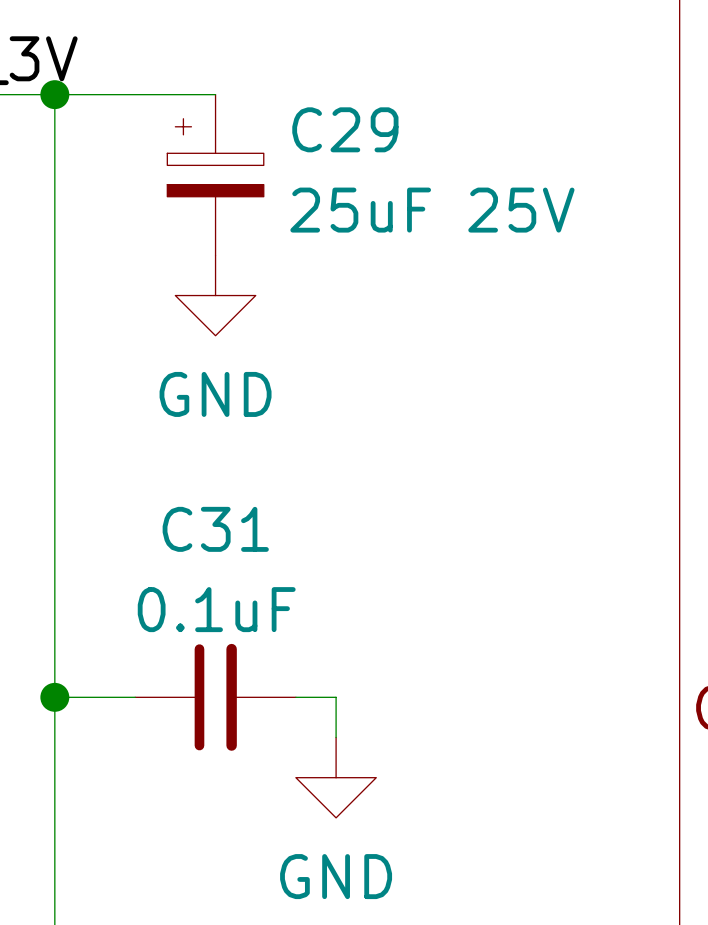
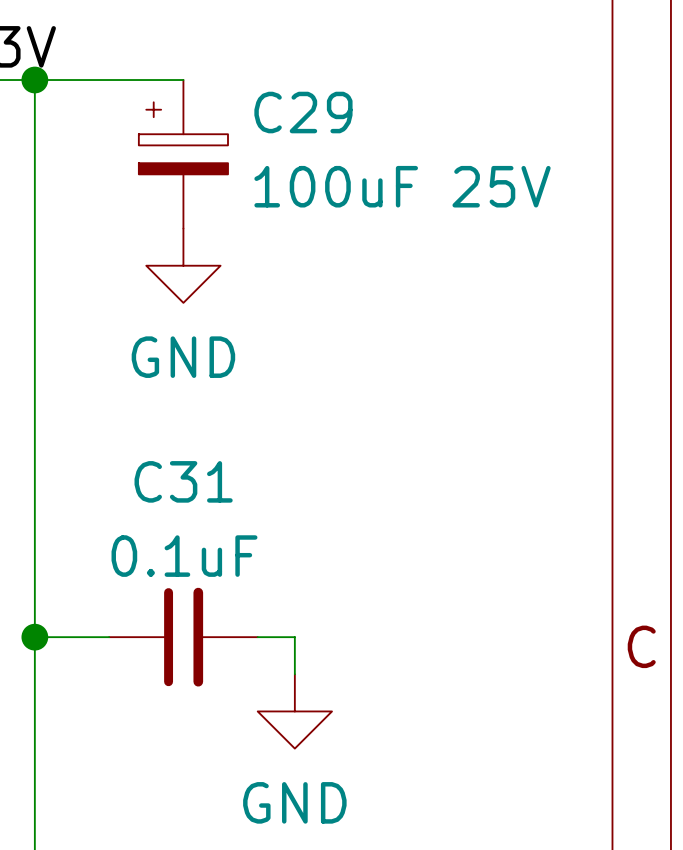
C29 value: 25uF 25V (432, 210) -> 100uF 25V (402, 186)

